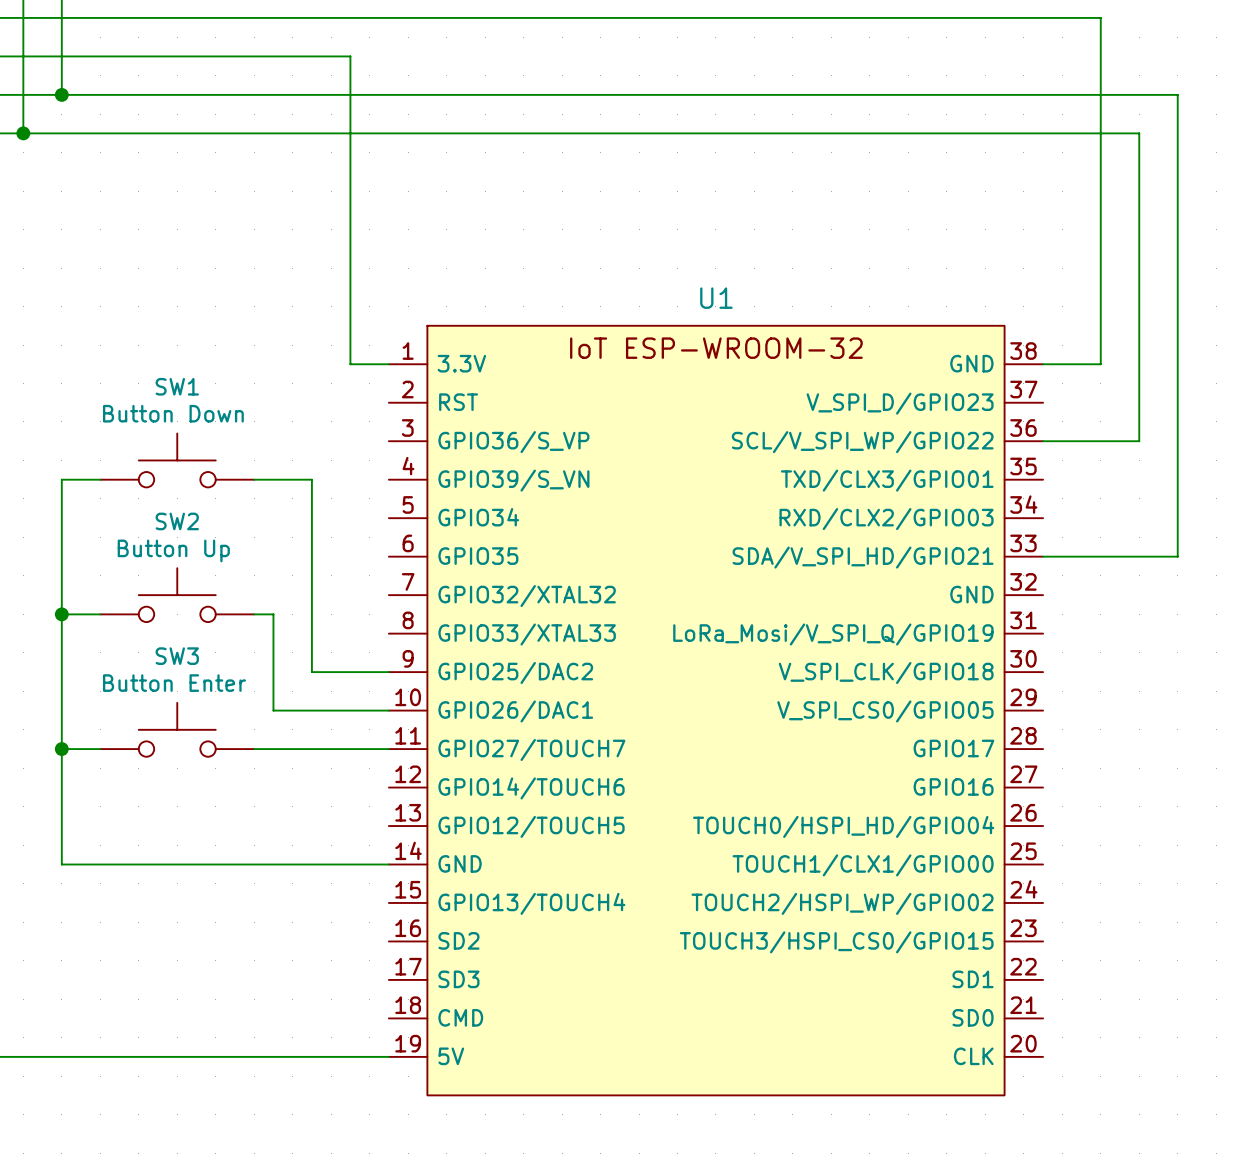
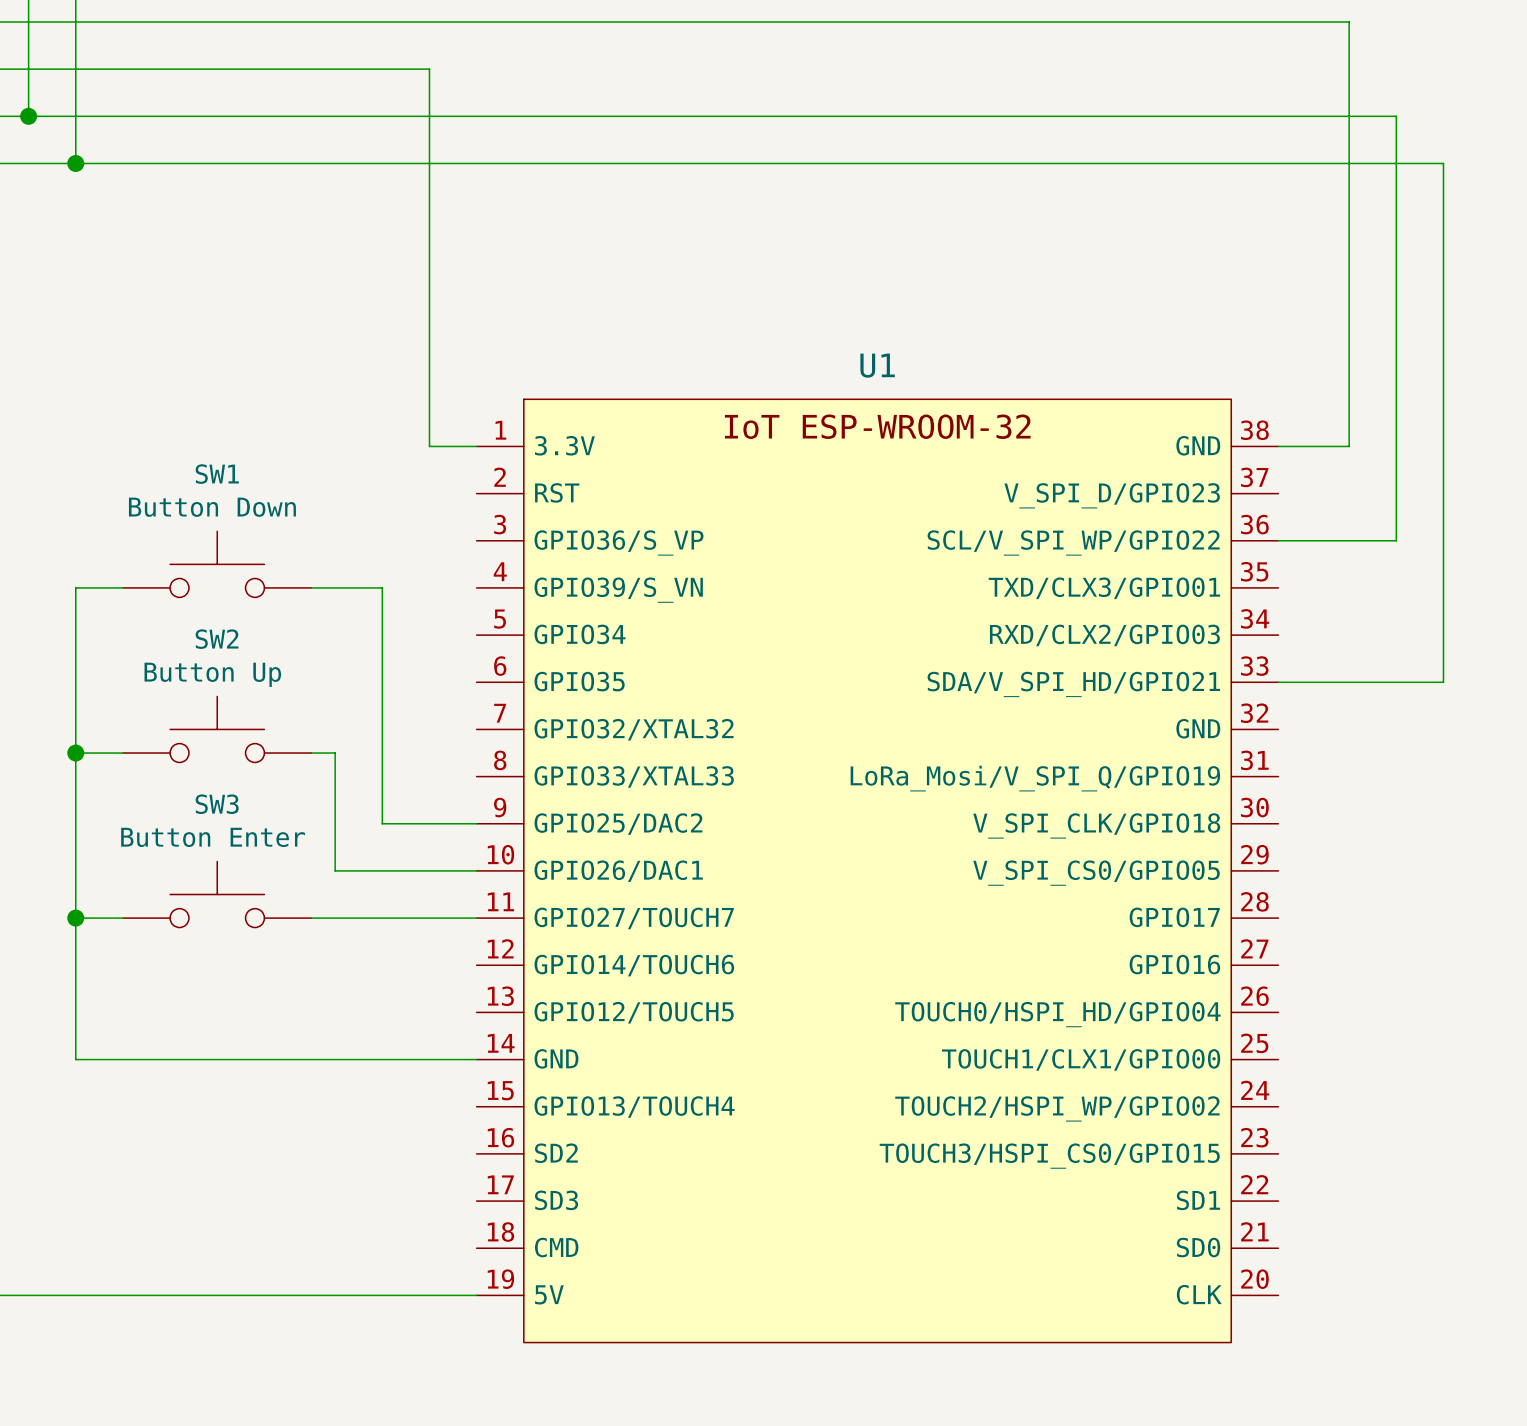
wire: (23, 94) (23, 133) -> (75, 116) (75, 163)
junction: none -> (28, 116)
junction: (61, 94) -> none
wire: (1139, 94) (1177, 94) (1177, 133) -> (1396, 116) (1396, 163) (1443, 163)
junction: (23, 133) -> none
junction: none -> (75, 163)

